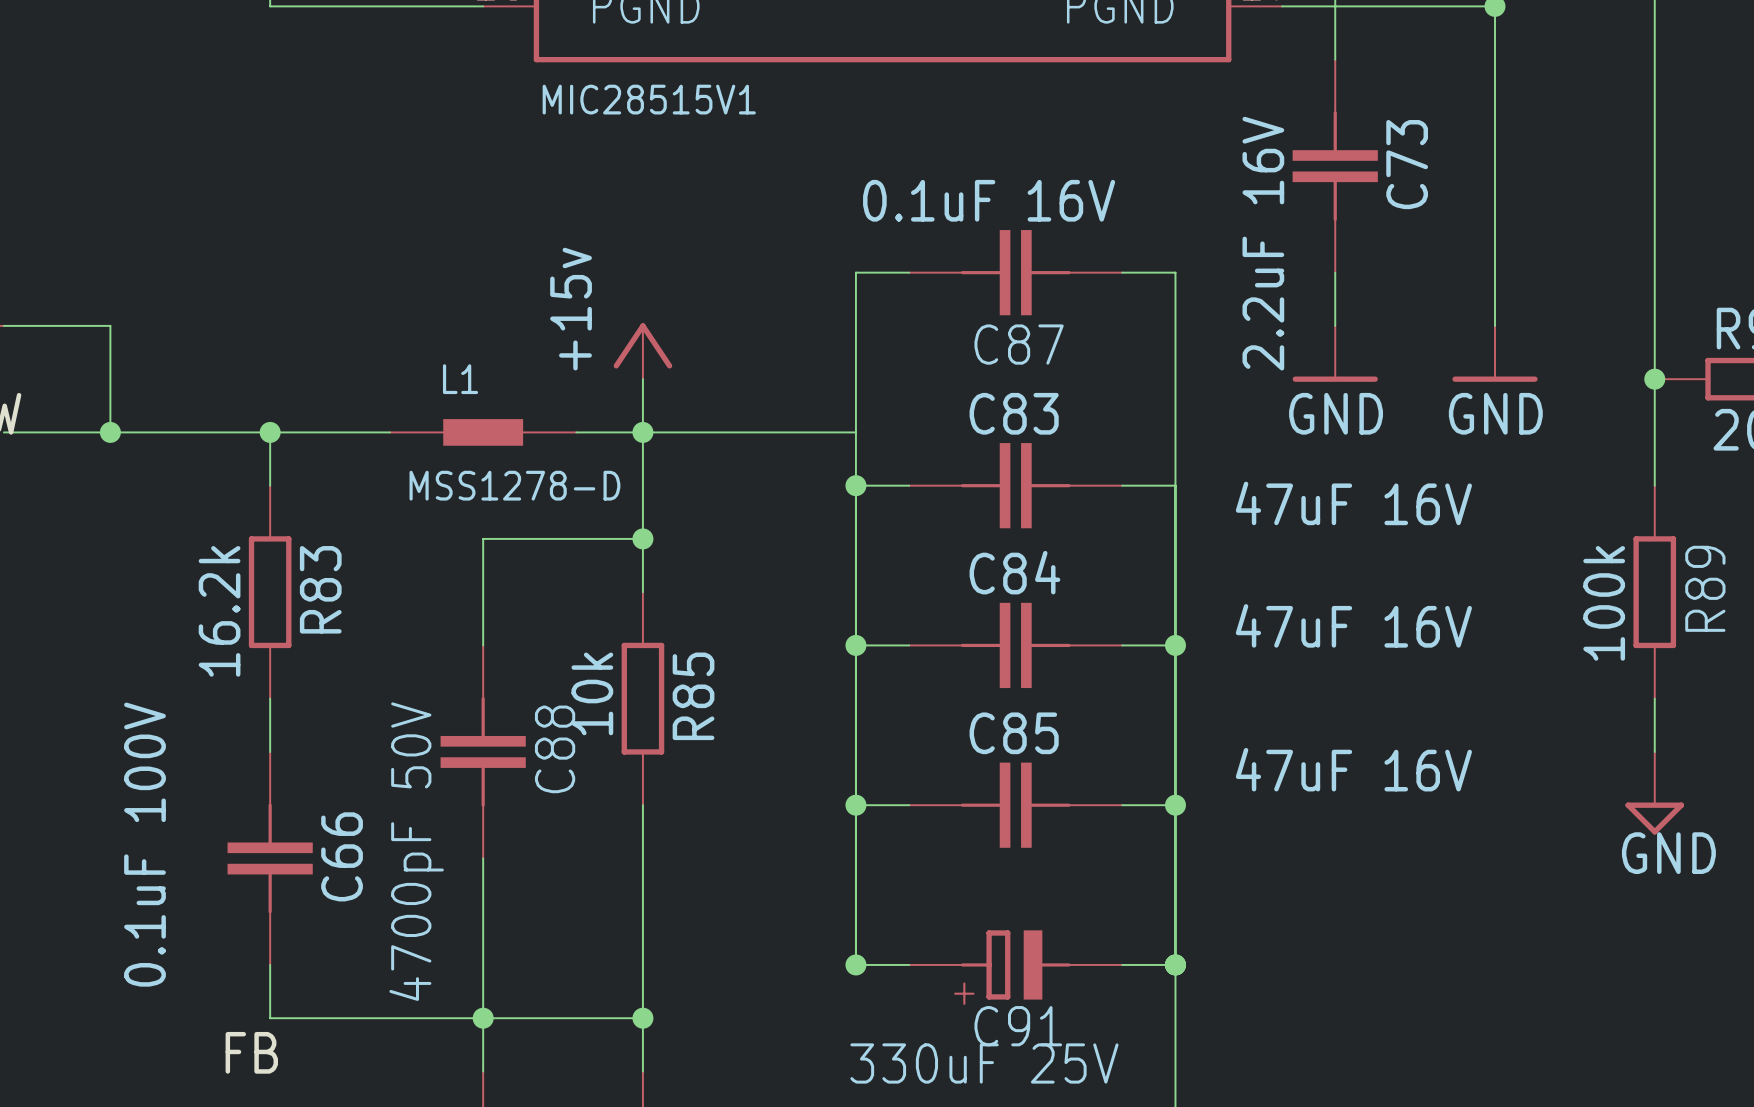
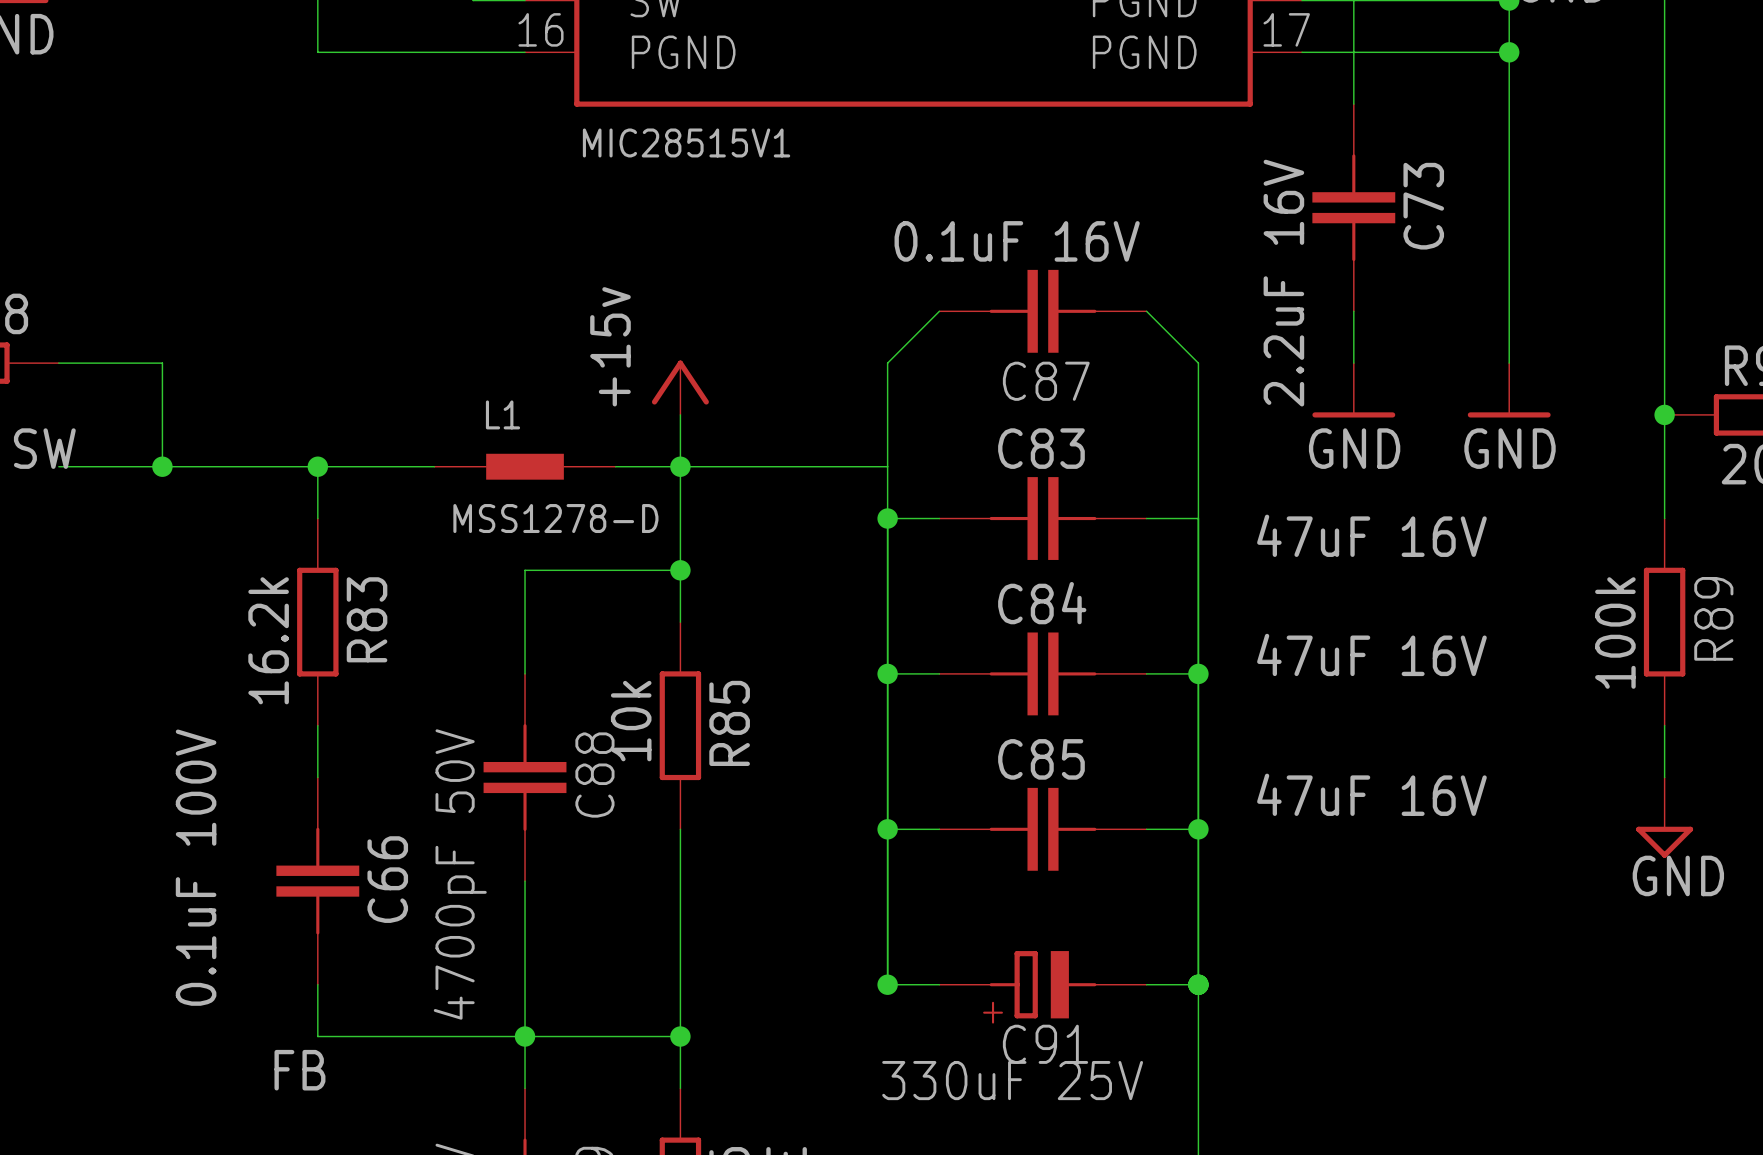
wire: (909, 272) (855, 272) (855, 325) -> (939, 311) (887, 363)
wire: (1122, 272) (1175, 272) (1175, 325) -> (1146, 311) (1198, 363)

